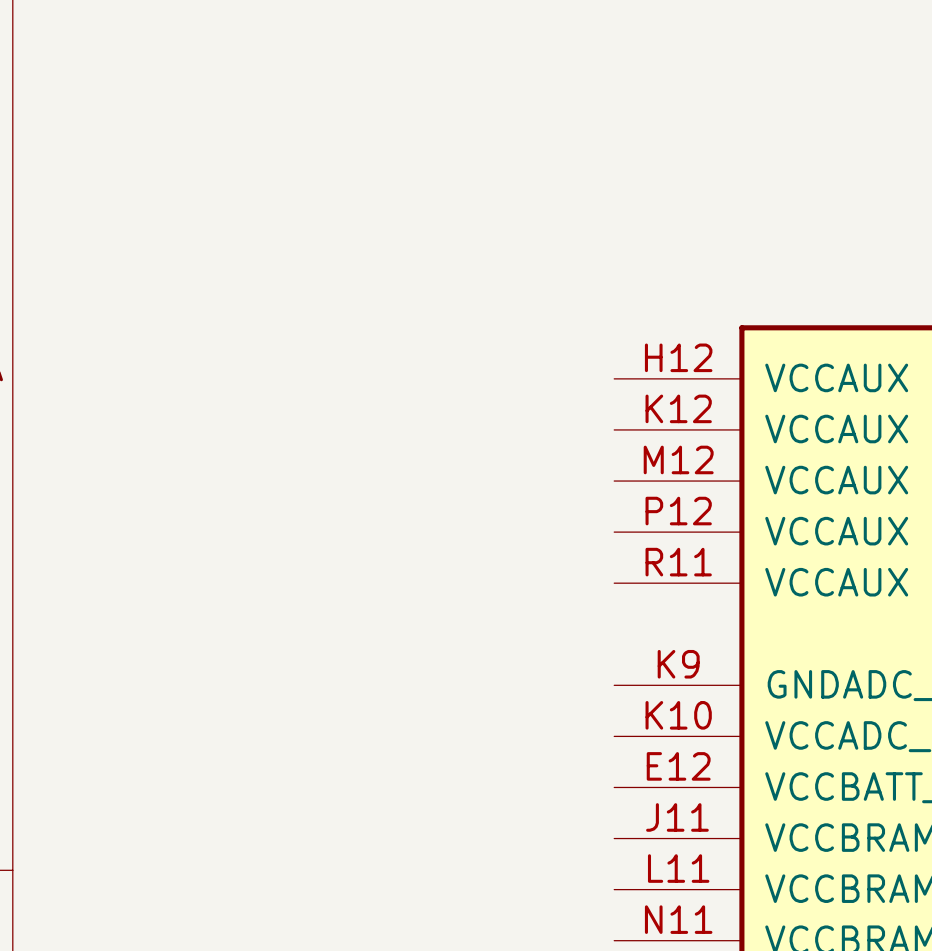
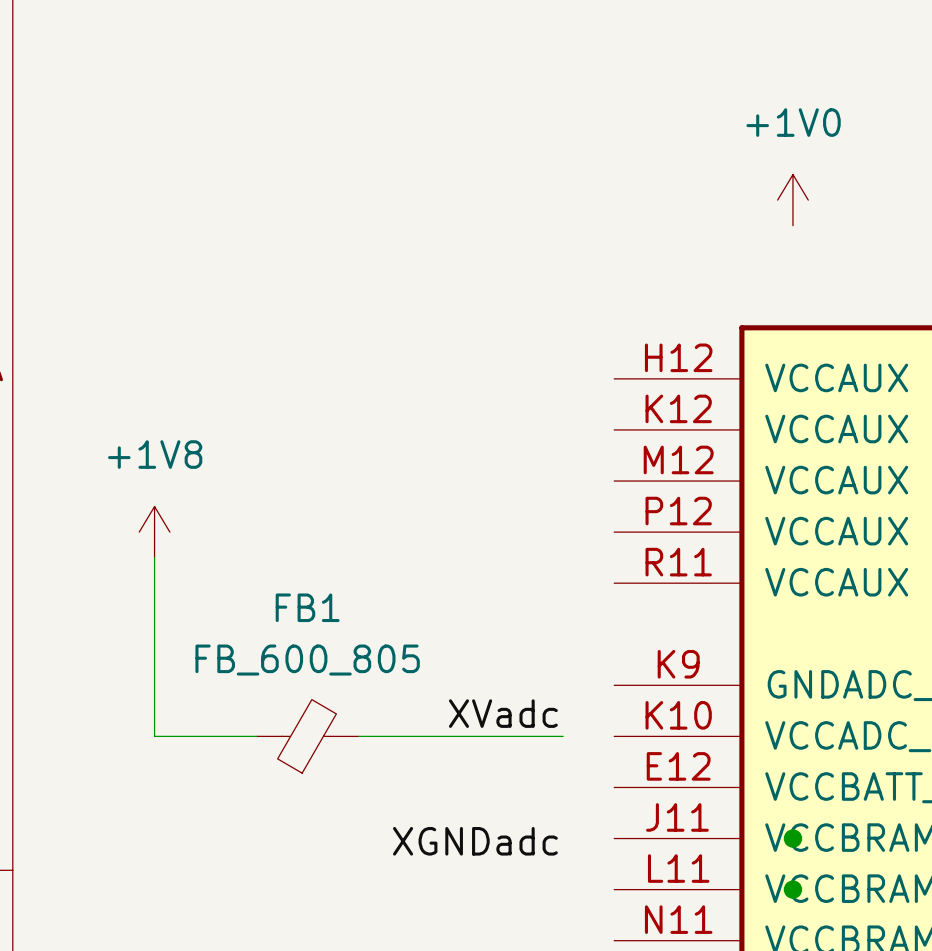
power symbol: none -> +1V0 (792, 200)
power symbol: none -> +1V8 (154, 532)
wire: none -> (154, 557) (154, 736) (256, 736)
label: none -> XVadc (503, 713)
FB1: none -> FB_600_805 (307, 736)
wire: none -> (358, 736) (563, 736)
junction: none -> (792, 838)
label: none -> XGNDadc (475, 841)
junction: none -> (792, 889)

